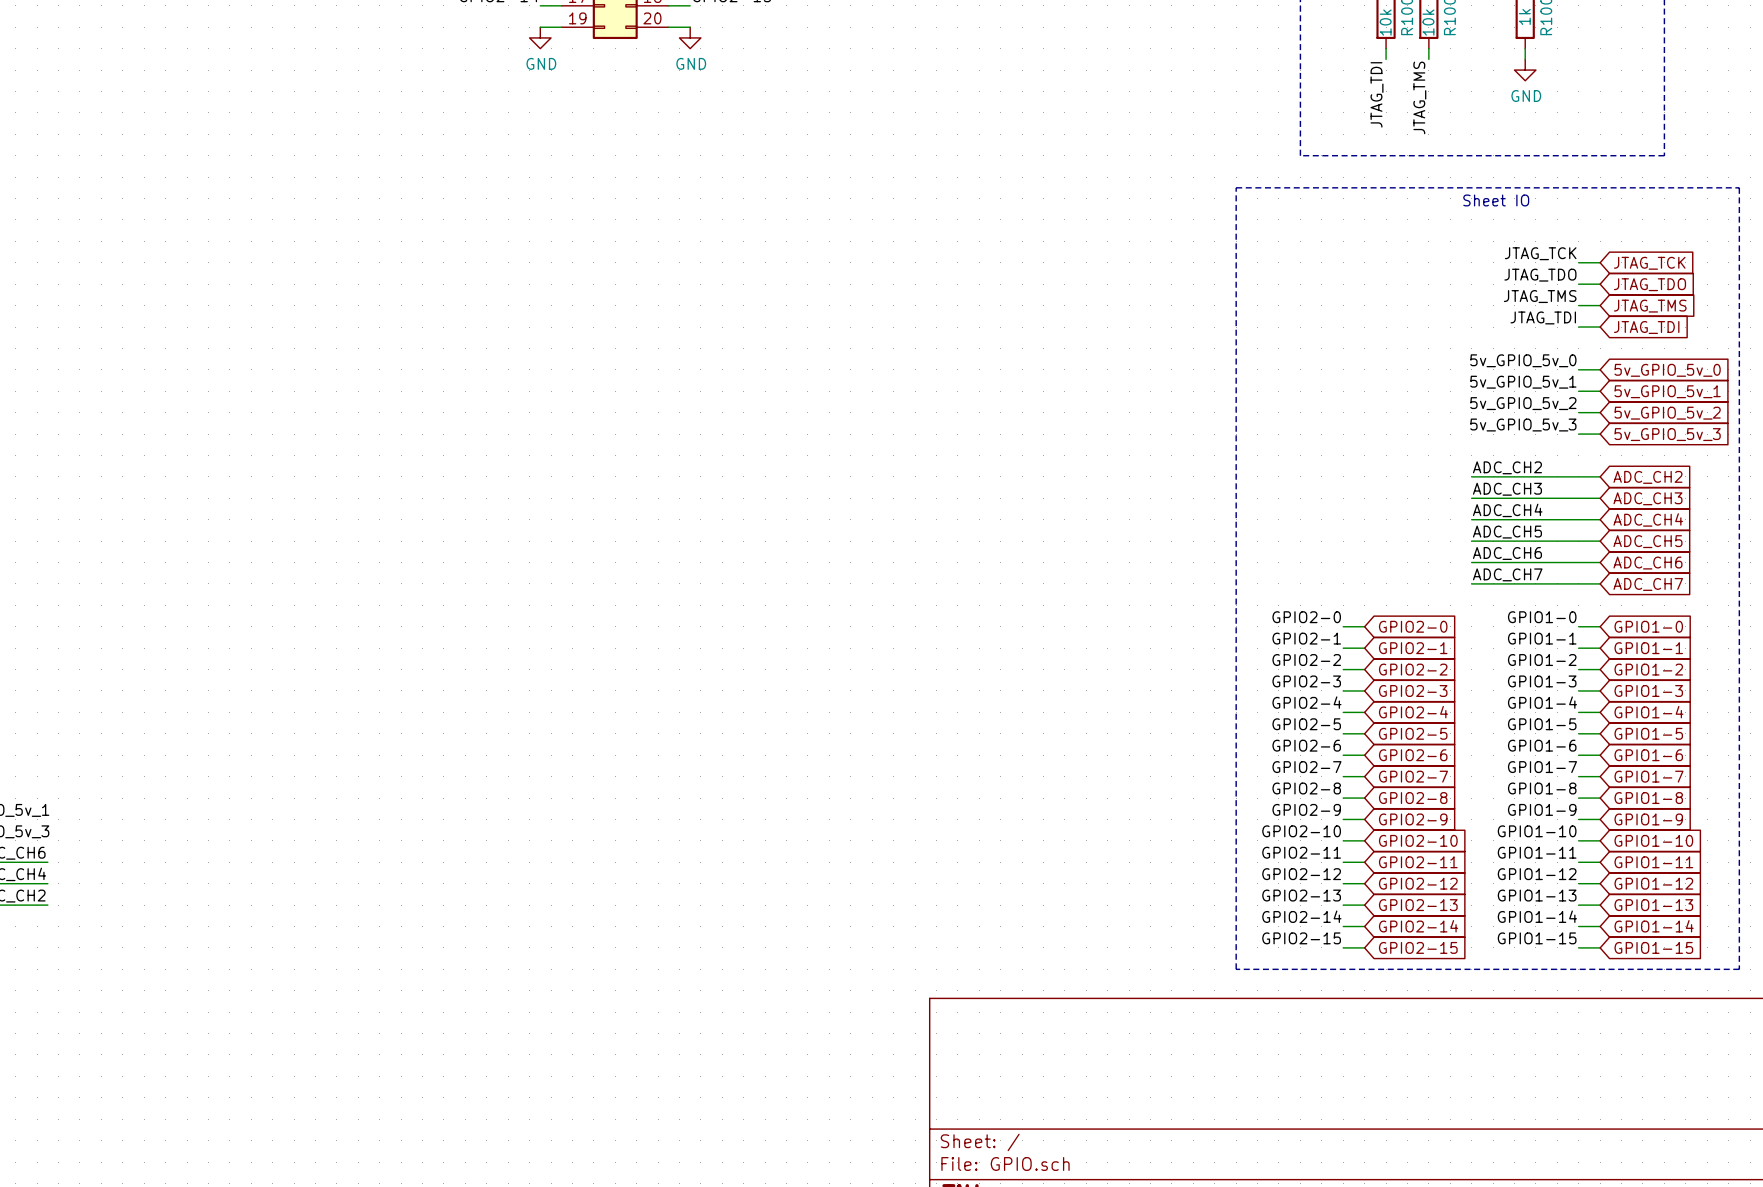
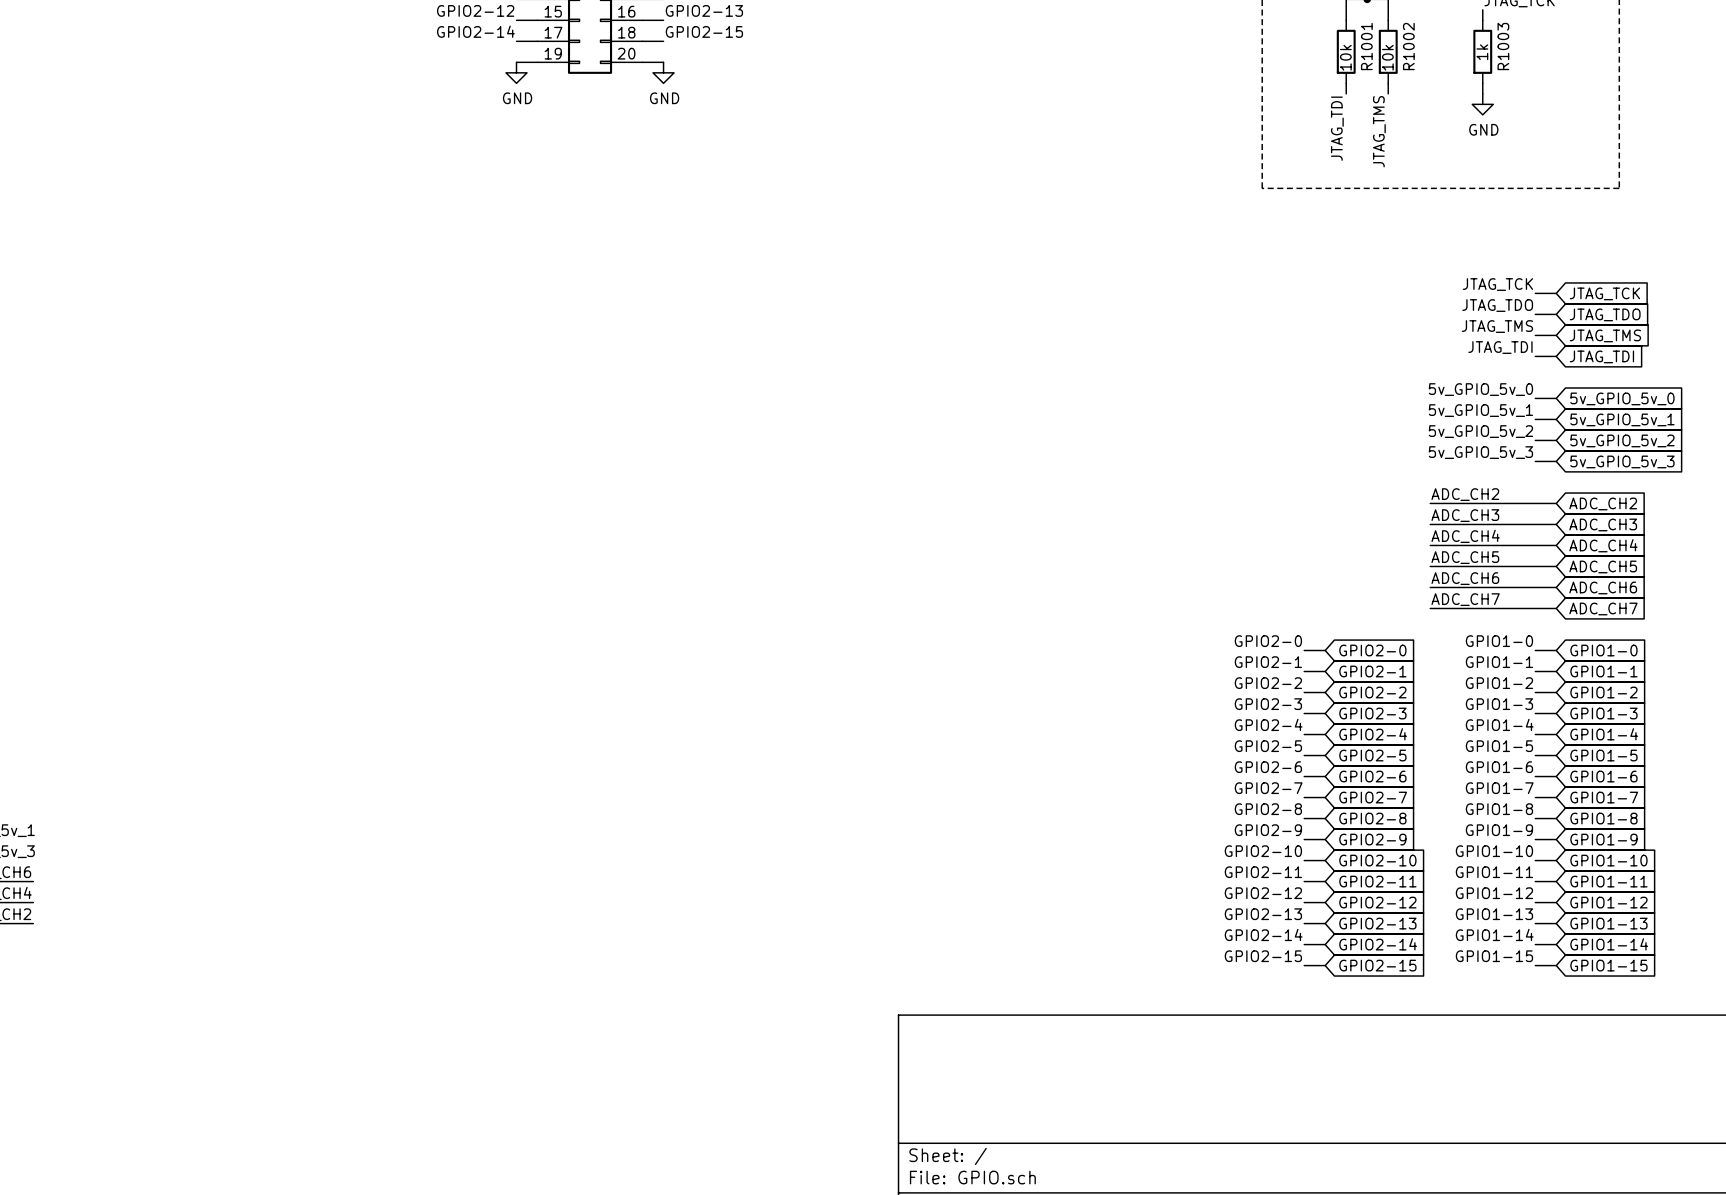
line: (1236, 187) (1739, 187) (1739, 969) (1236, 969) (1236, 187) -> none
text: Sheet IO (1496, 200) -> none

